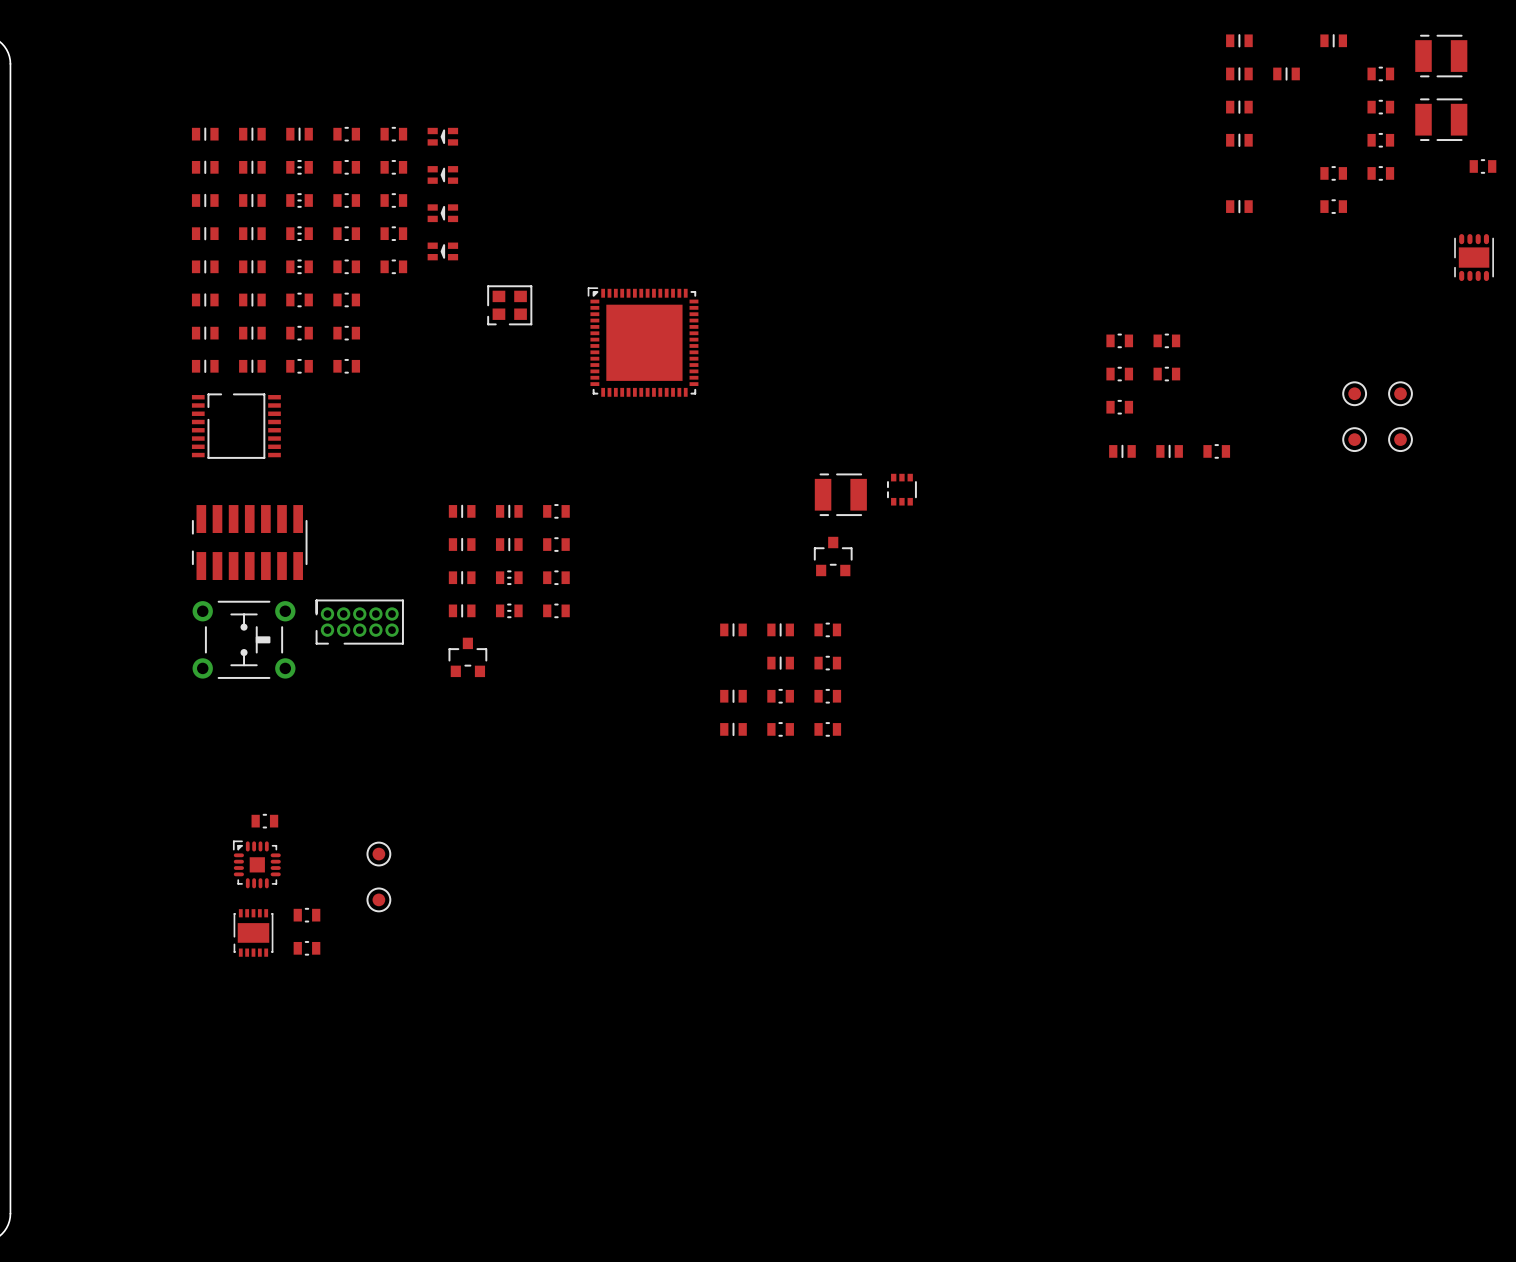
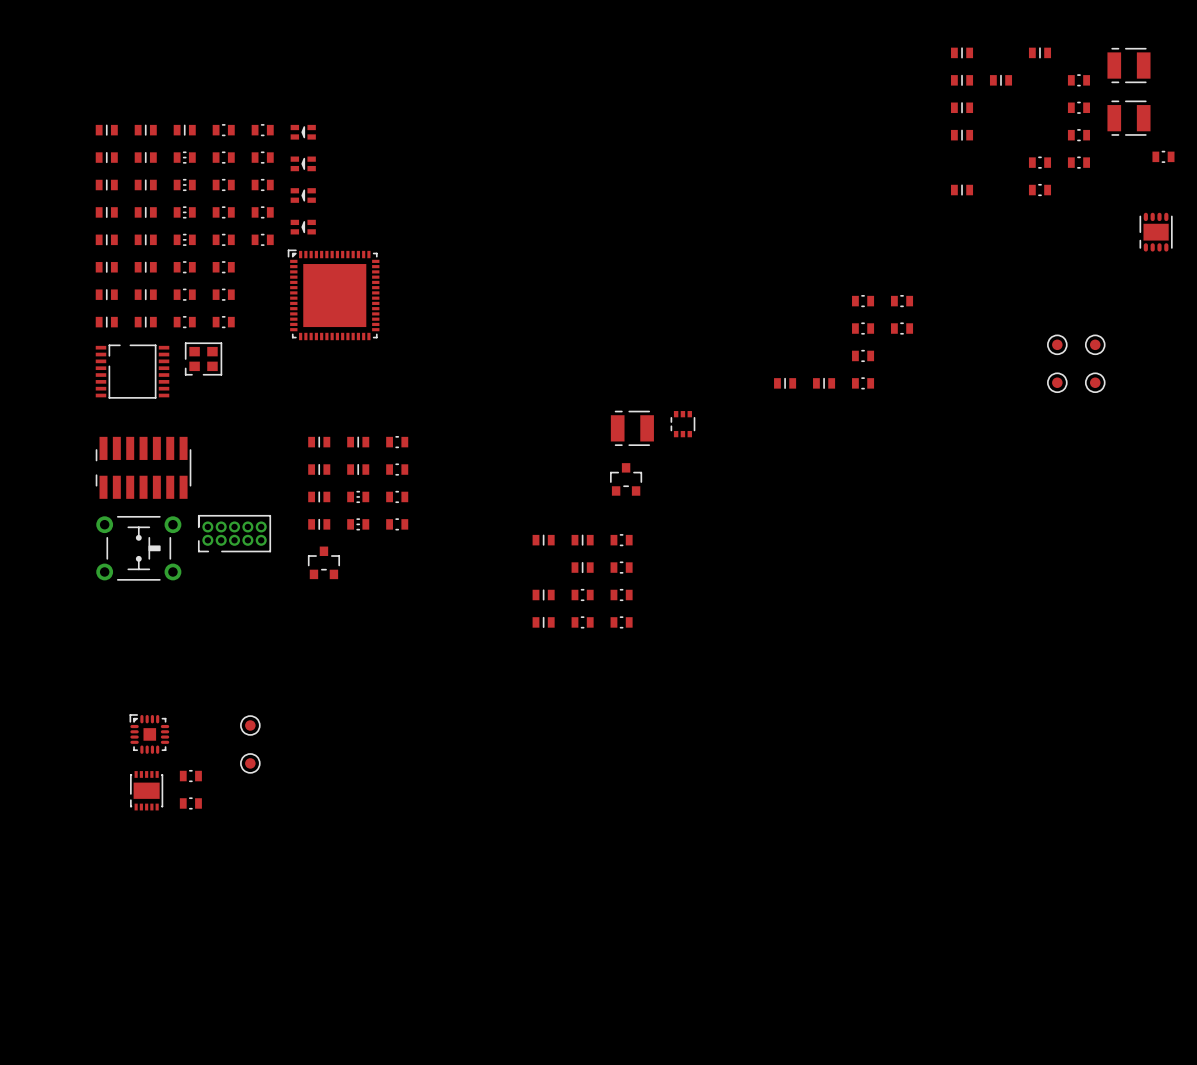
part position: (509, 305) -> (203, 358)
part position: (643, 342) -> (333, 295)
part: none -> (785, 383)
part: none -> (824, 383)
part footprint: [1109, 444, 1136, 459] -> [852, 377, 875, 390]
part: (1169, 451) -> none
part: (1216, 451) -> none
part: (264, 821) -> none

